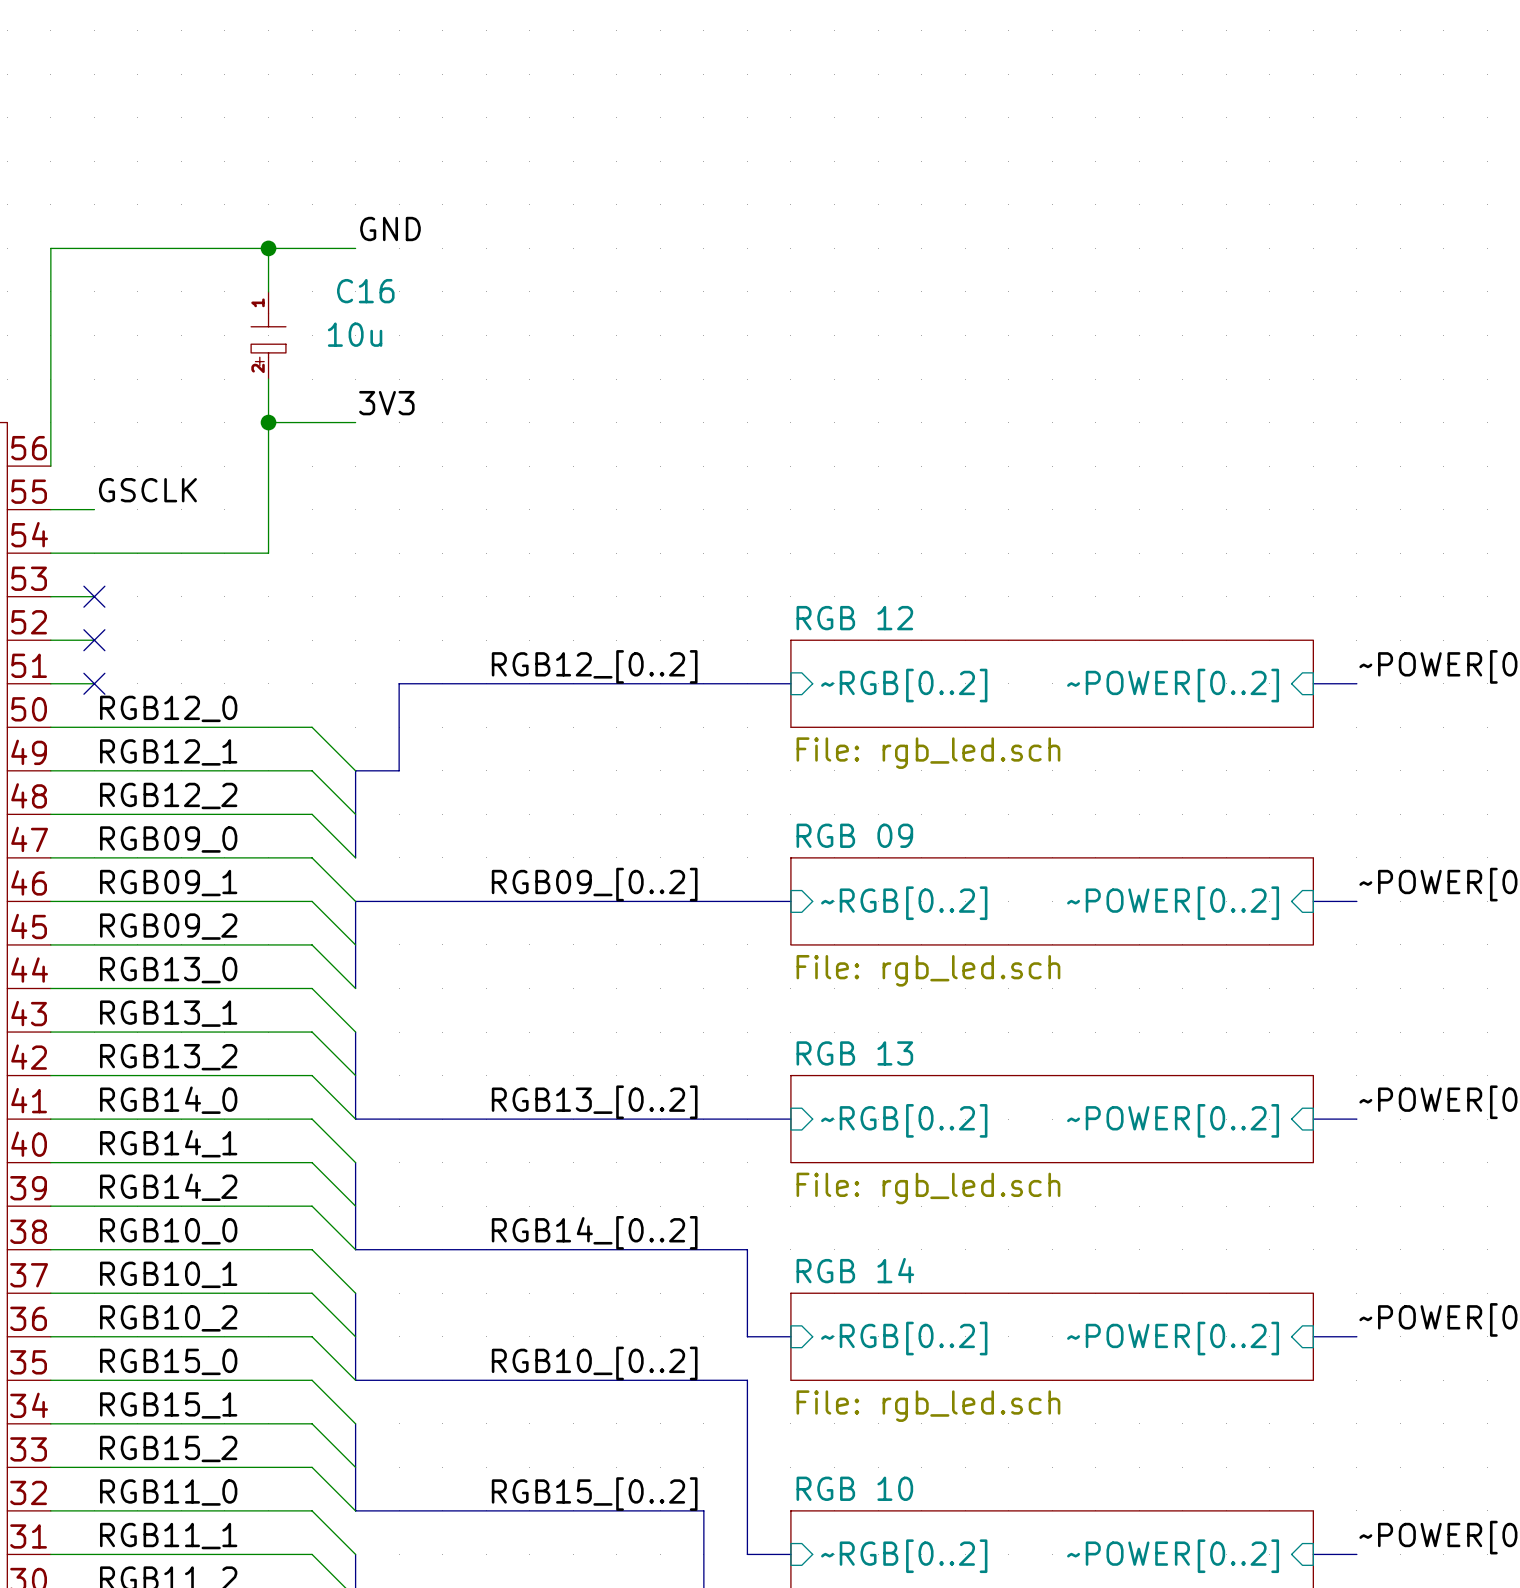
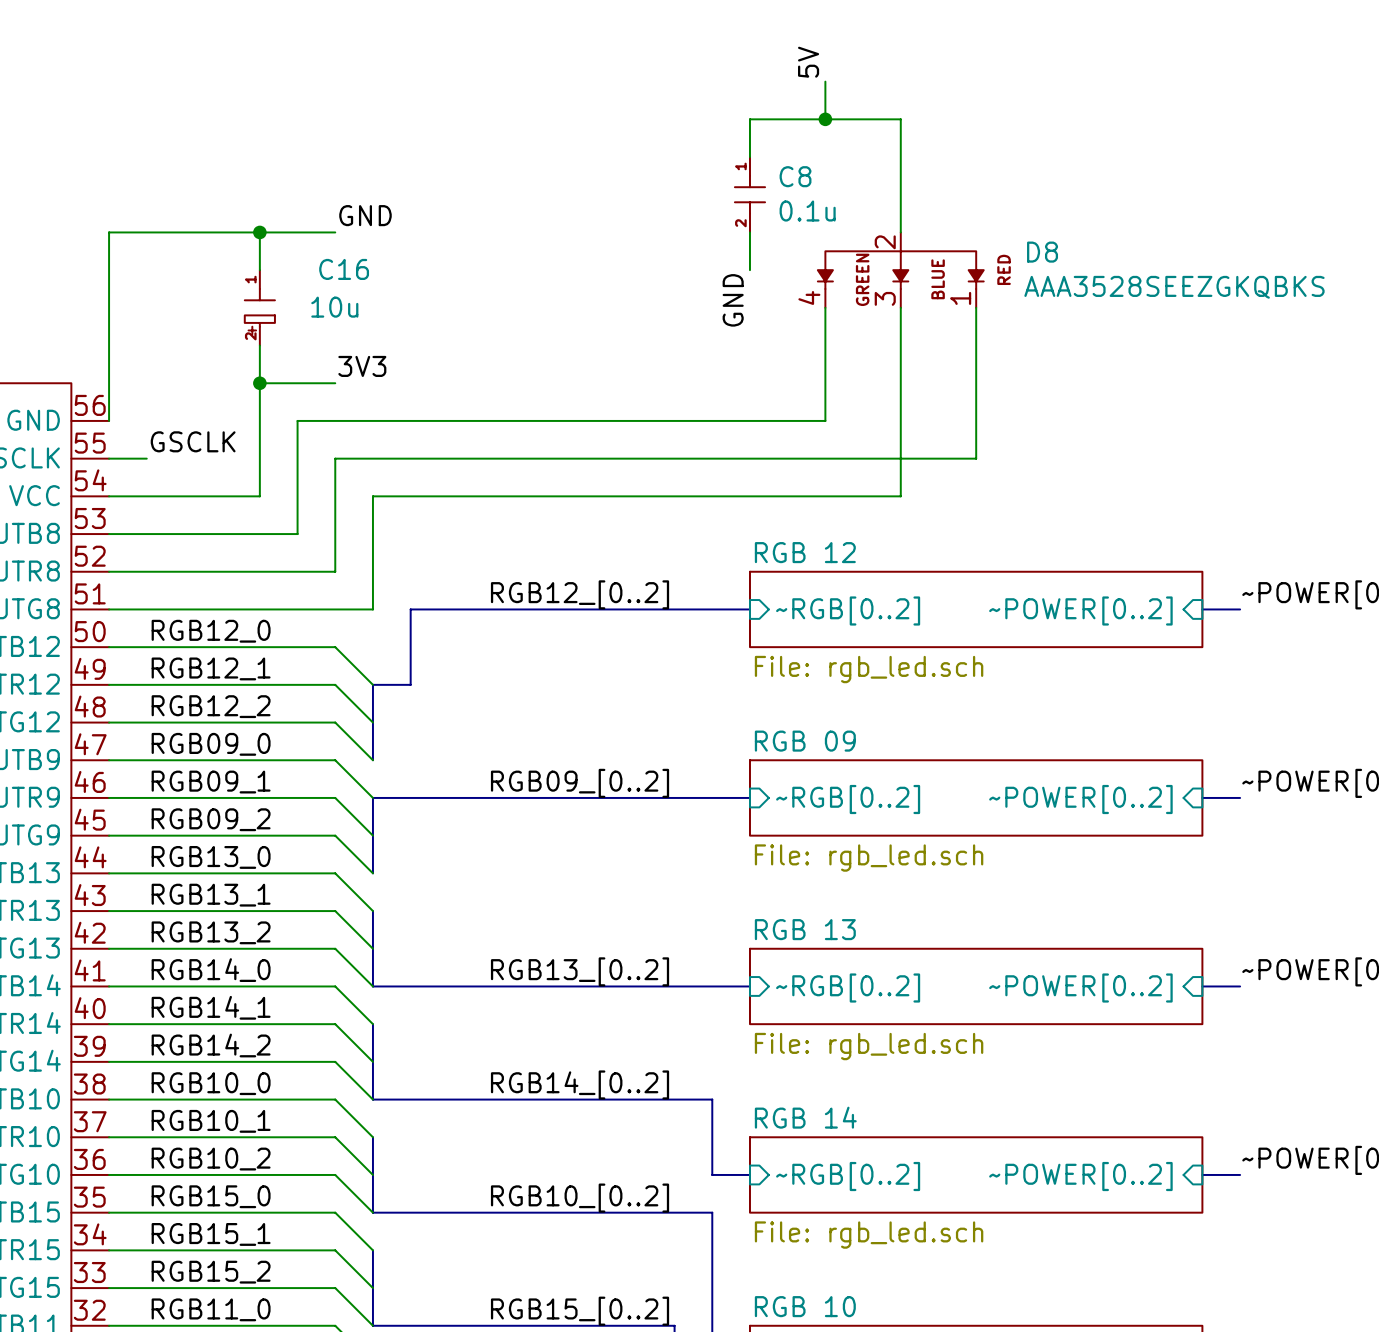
label: none -> 5V (808, 62)
wire: none -> (825, 81) (825, 119)
junction: none -> (825, 119)
wire: none -> (749, 157) (749, 119) (900, 119) (900, 232)
C8: none -> 0.1u (749, 194)
label position: GND (390, 229) -> GND (365, 215)
wire: (268, 248) (268, 291) -> (259, 232) (259, 270)
junction position: (268, 248) -> (259, 232)
wire: (312, 248) (355, 248) -> none
wire: none -> (749, 232) (749, 270)
D8: none -> AAA3528SEEZGKQBKS (900, 270)
label: none -> GND (733, 300)
C16 position: (268, 335) -> (259, 307)
wire: none -> (900, 307) (900, 496) (372, 496) (372, 609) (146, 609)
wire: none -> (976, 307) (976, 458) (335, 458) (335, 571) (146, 571)
wire: none -> (259, 345) (259, 496)
wire: (268, 379) (268, 466) -> (825, 307) (825, 420) (297, 420)
label position: 3V3 (386, 403) -> 3V3 (362, 366)
junction position: (268, 422) -> (259, 383)
wire: (312, 422) (355, 422) -> (259, 383) (297, 383)
wire: (224, 553) (268, 553) -> (146, 534) (297, 534) (297, 496)
no-connect mark: (94, 596) -> none
no-connect mark: (94, 640) -> none
no-connect mark: (94, 683) -> none

